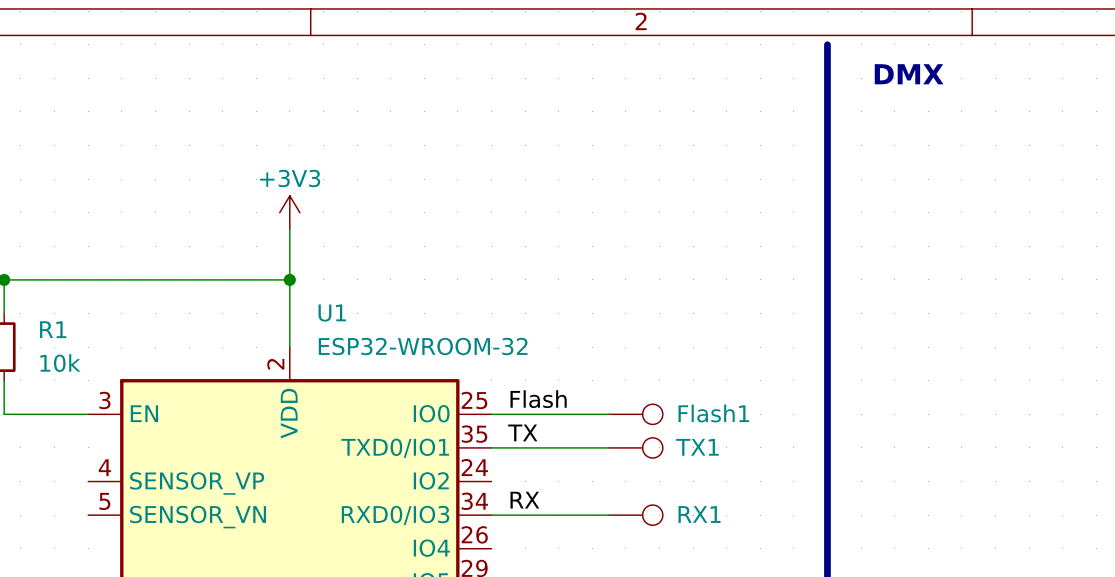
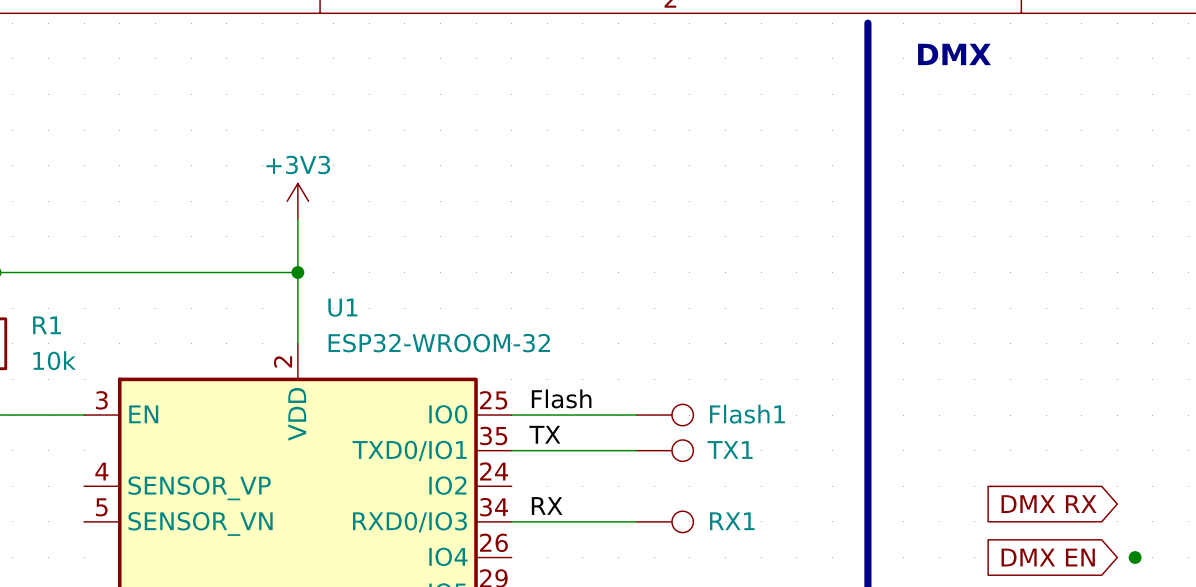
global label: none -> DMX RX (1049, 504)
global label: none -> DMX EN (1048, 557)
junction: none -> (1135, 557)

